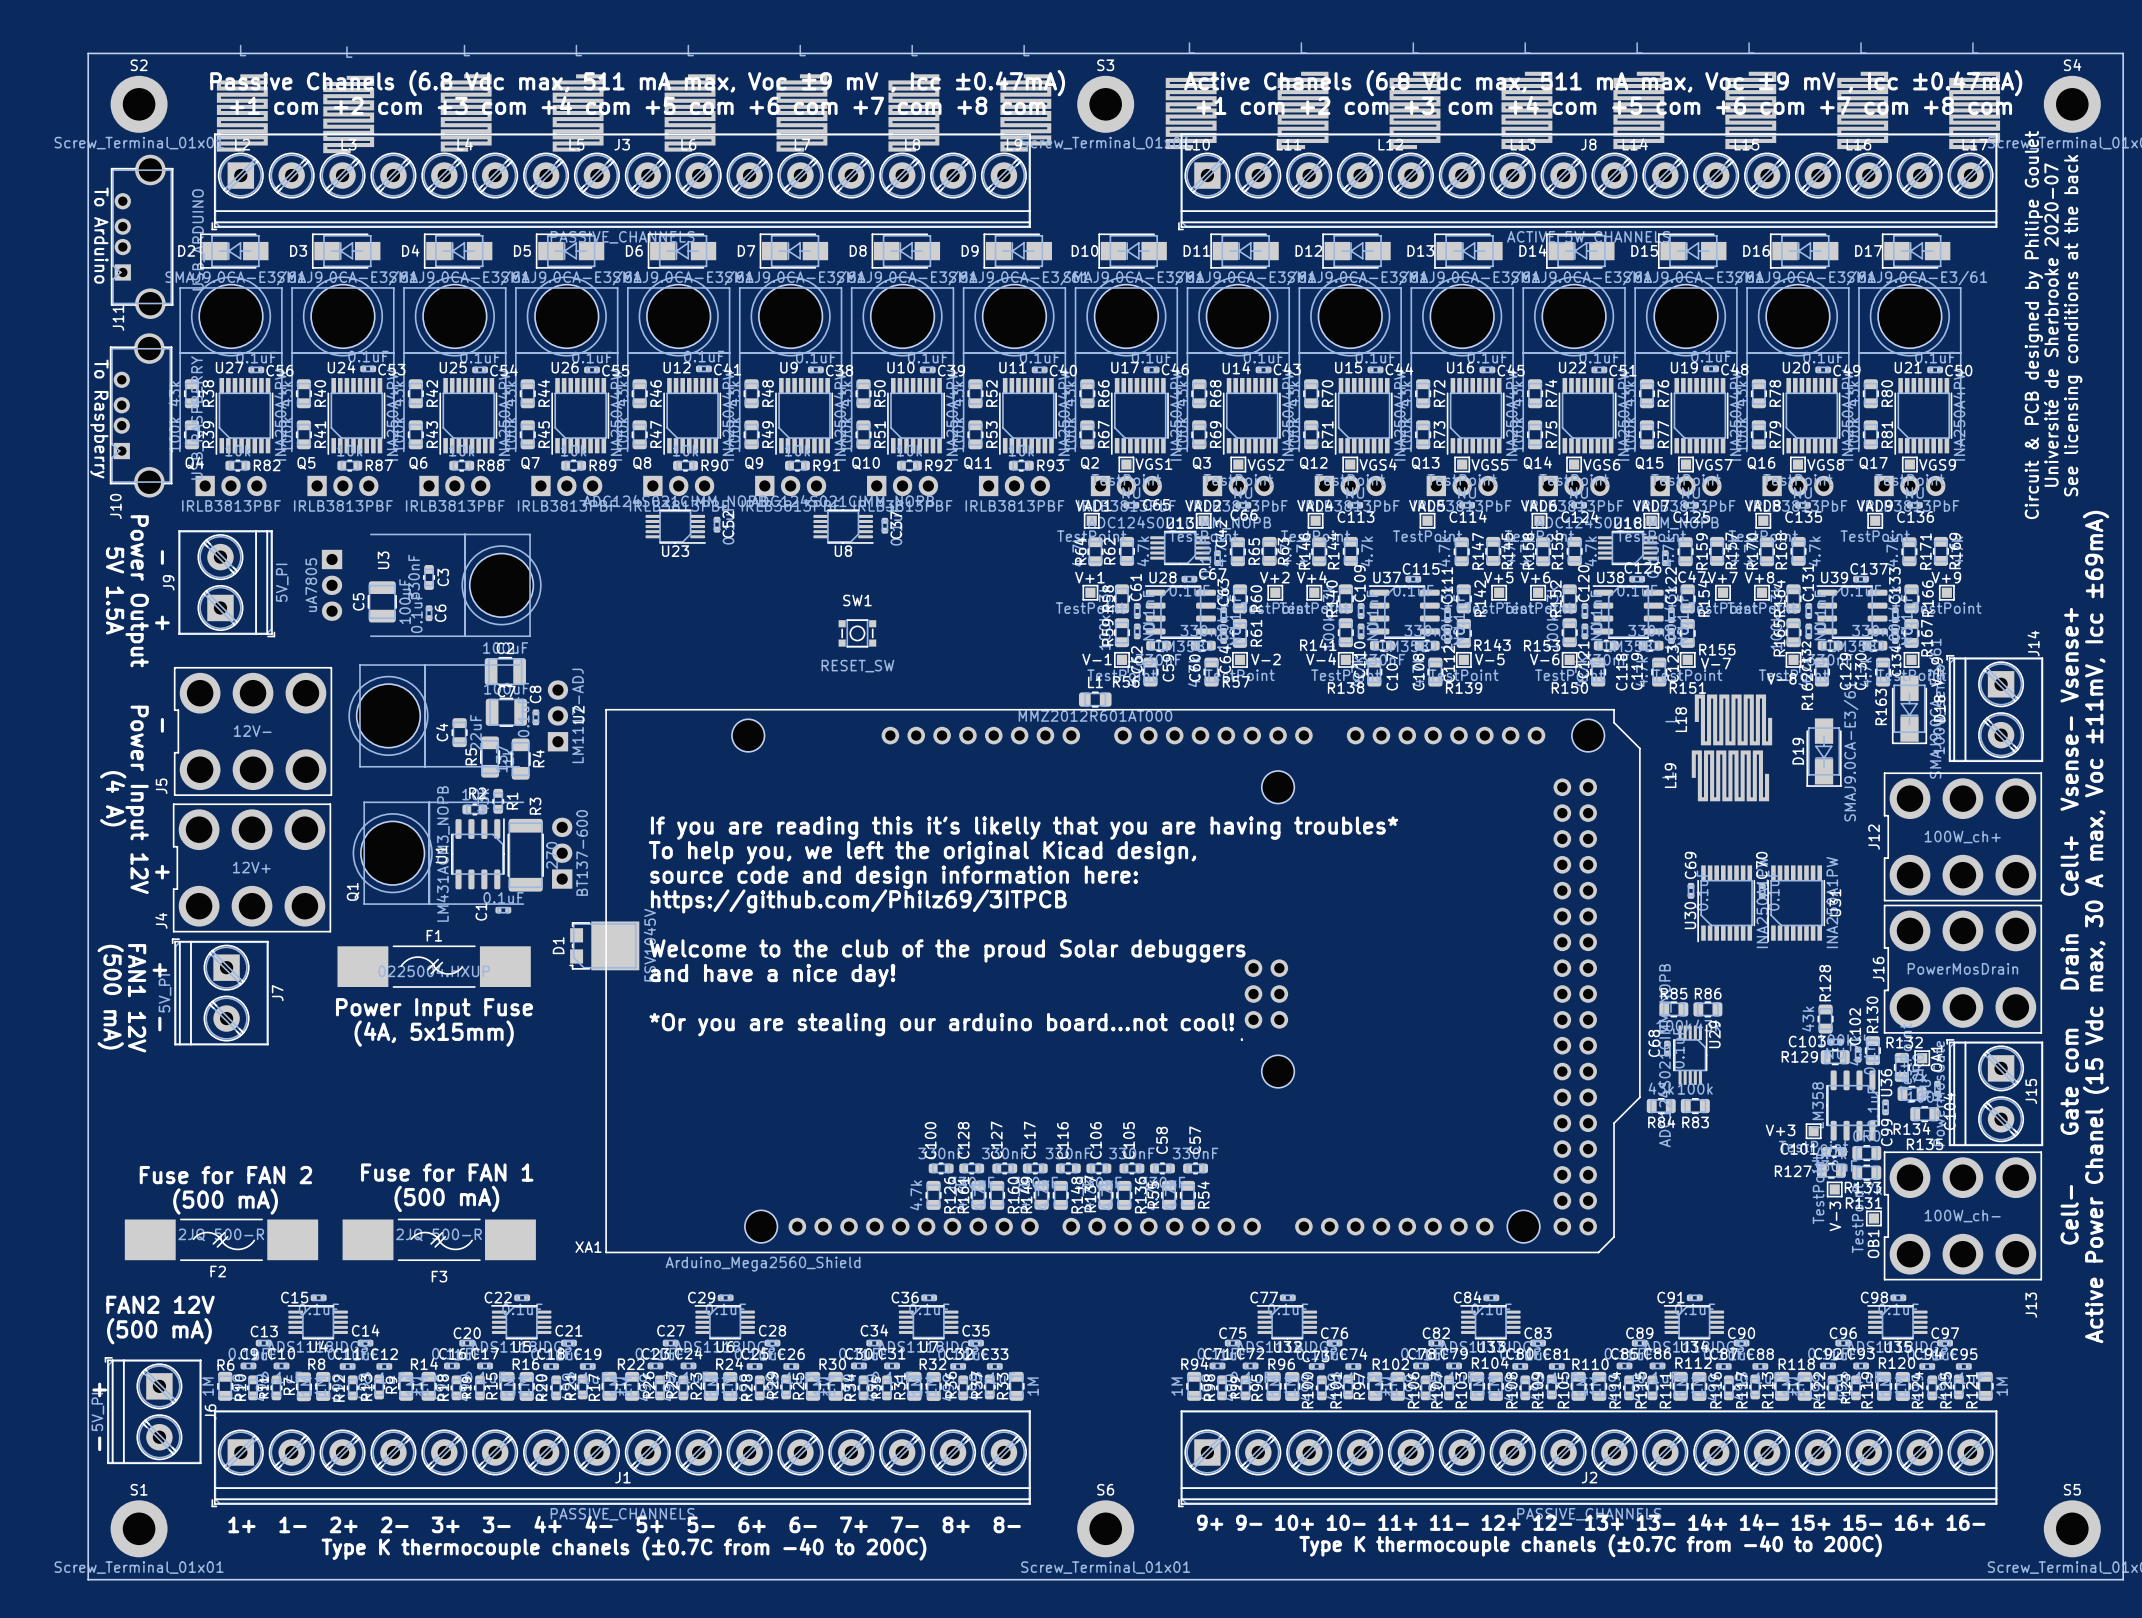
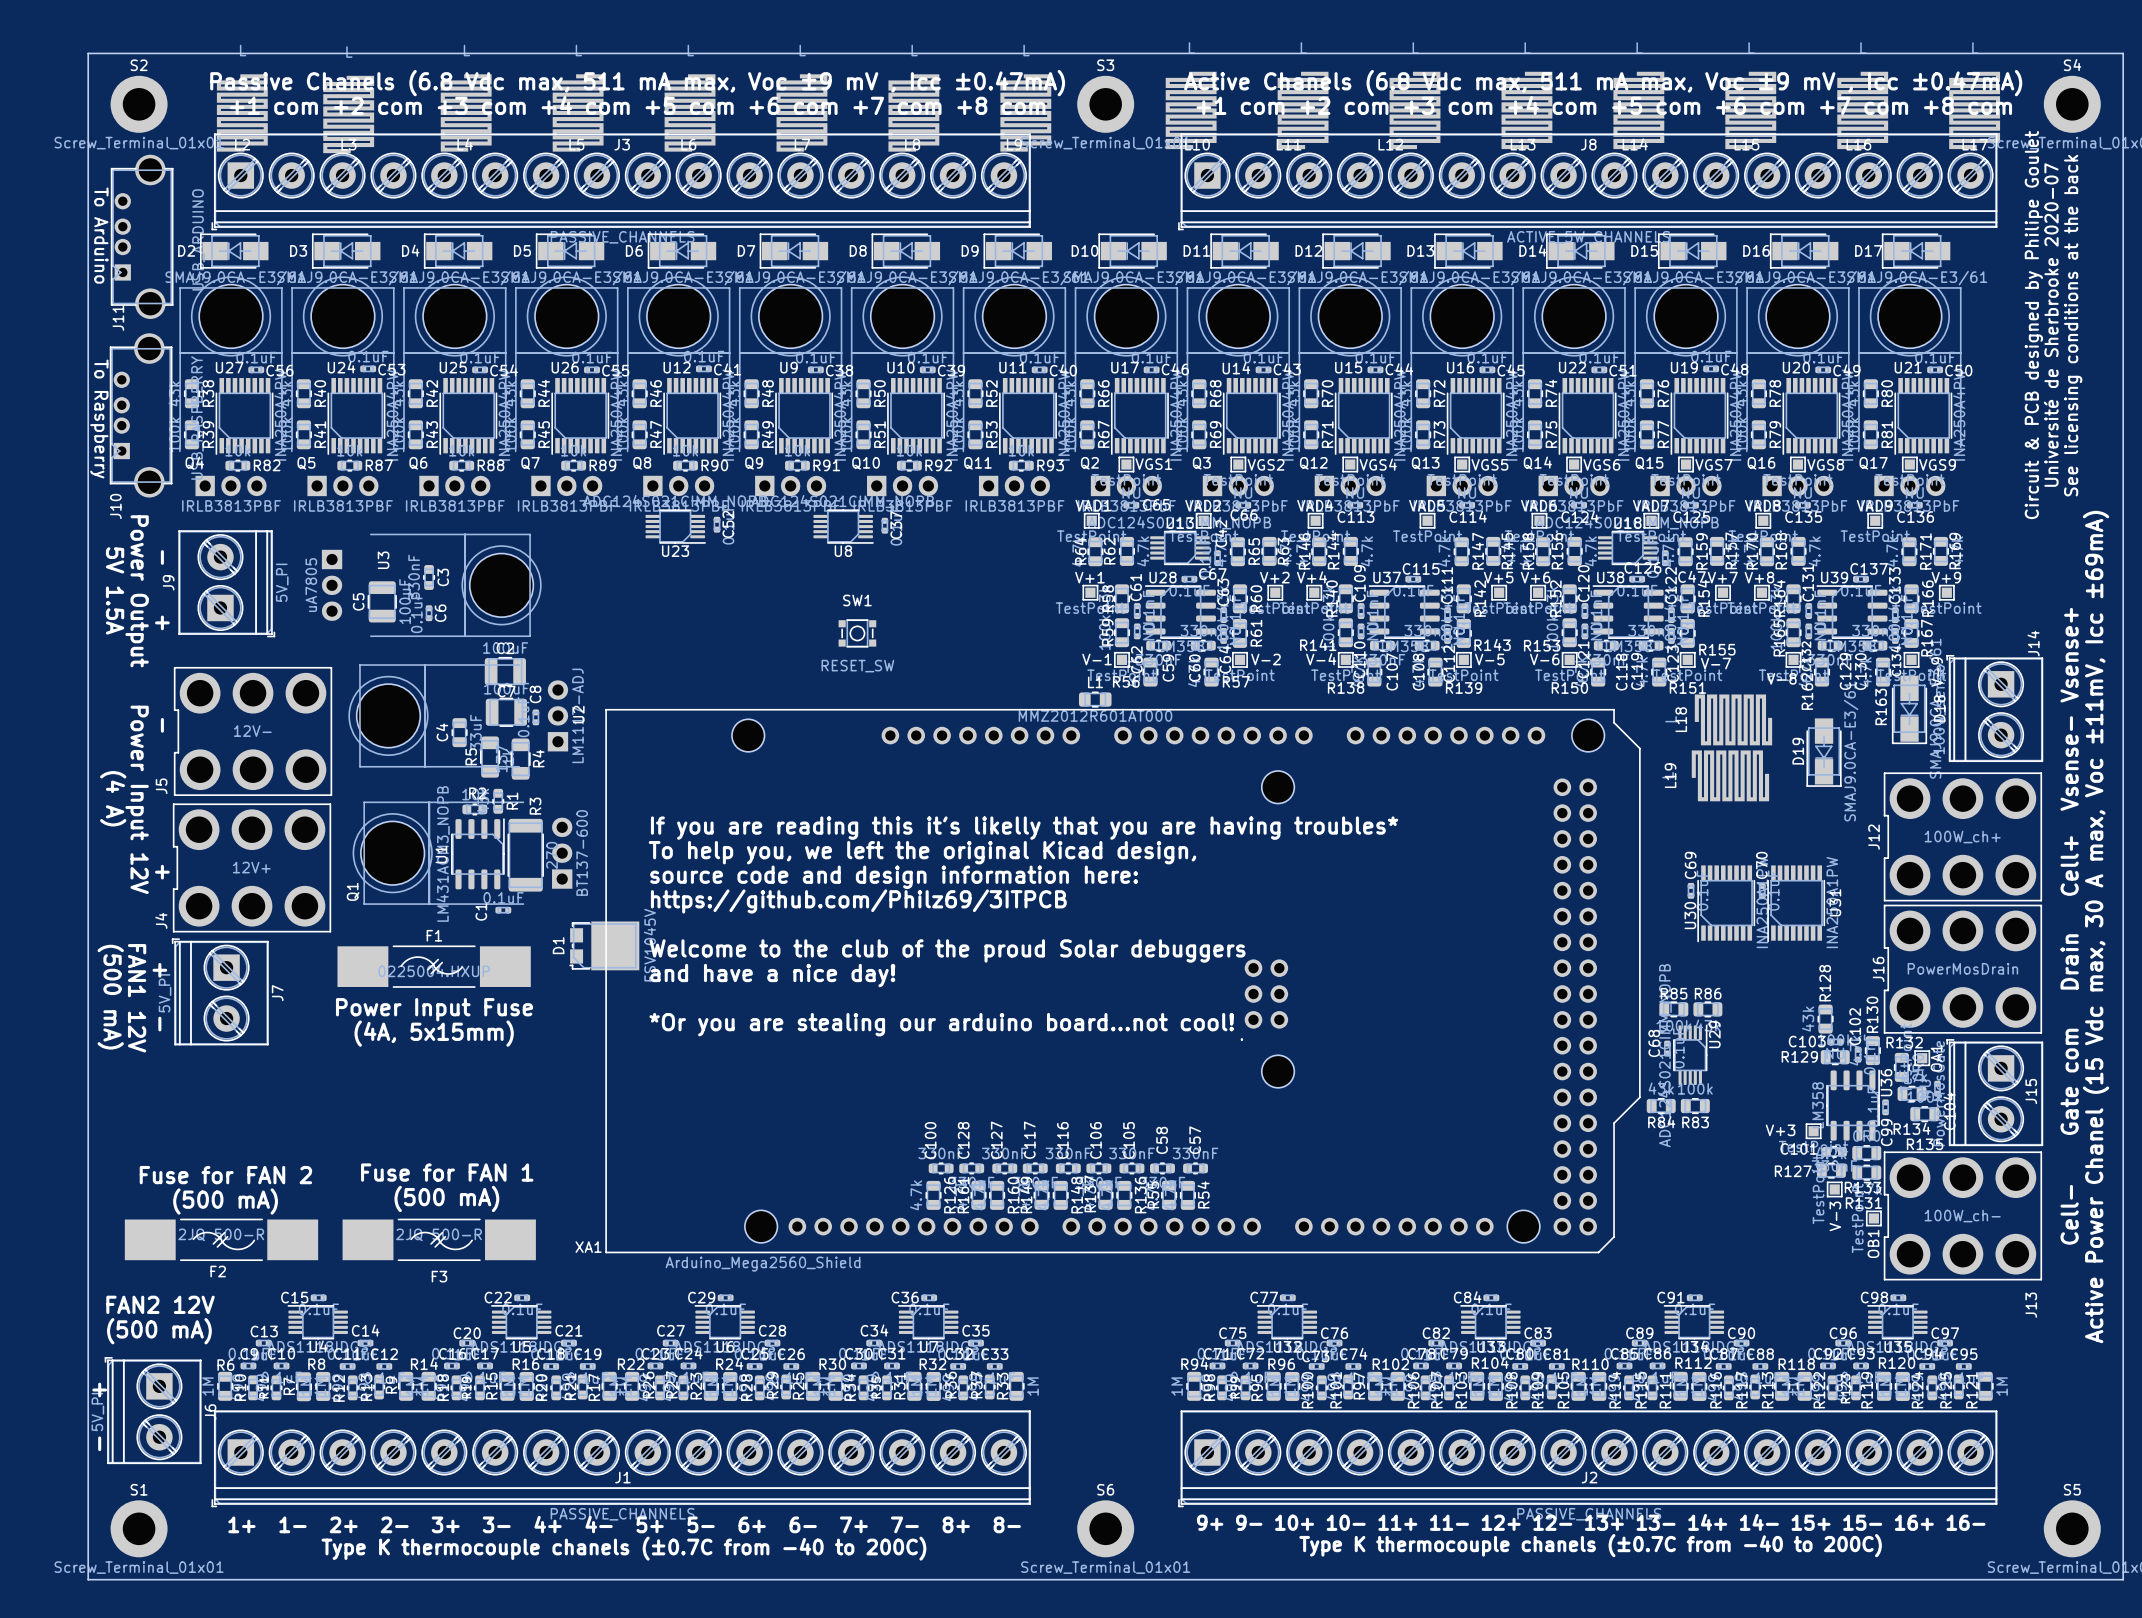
C4 value: 22uF (475, 732) -> 33uF (475, 732)

